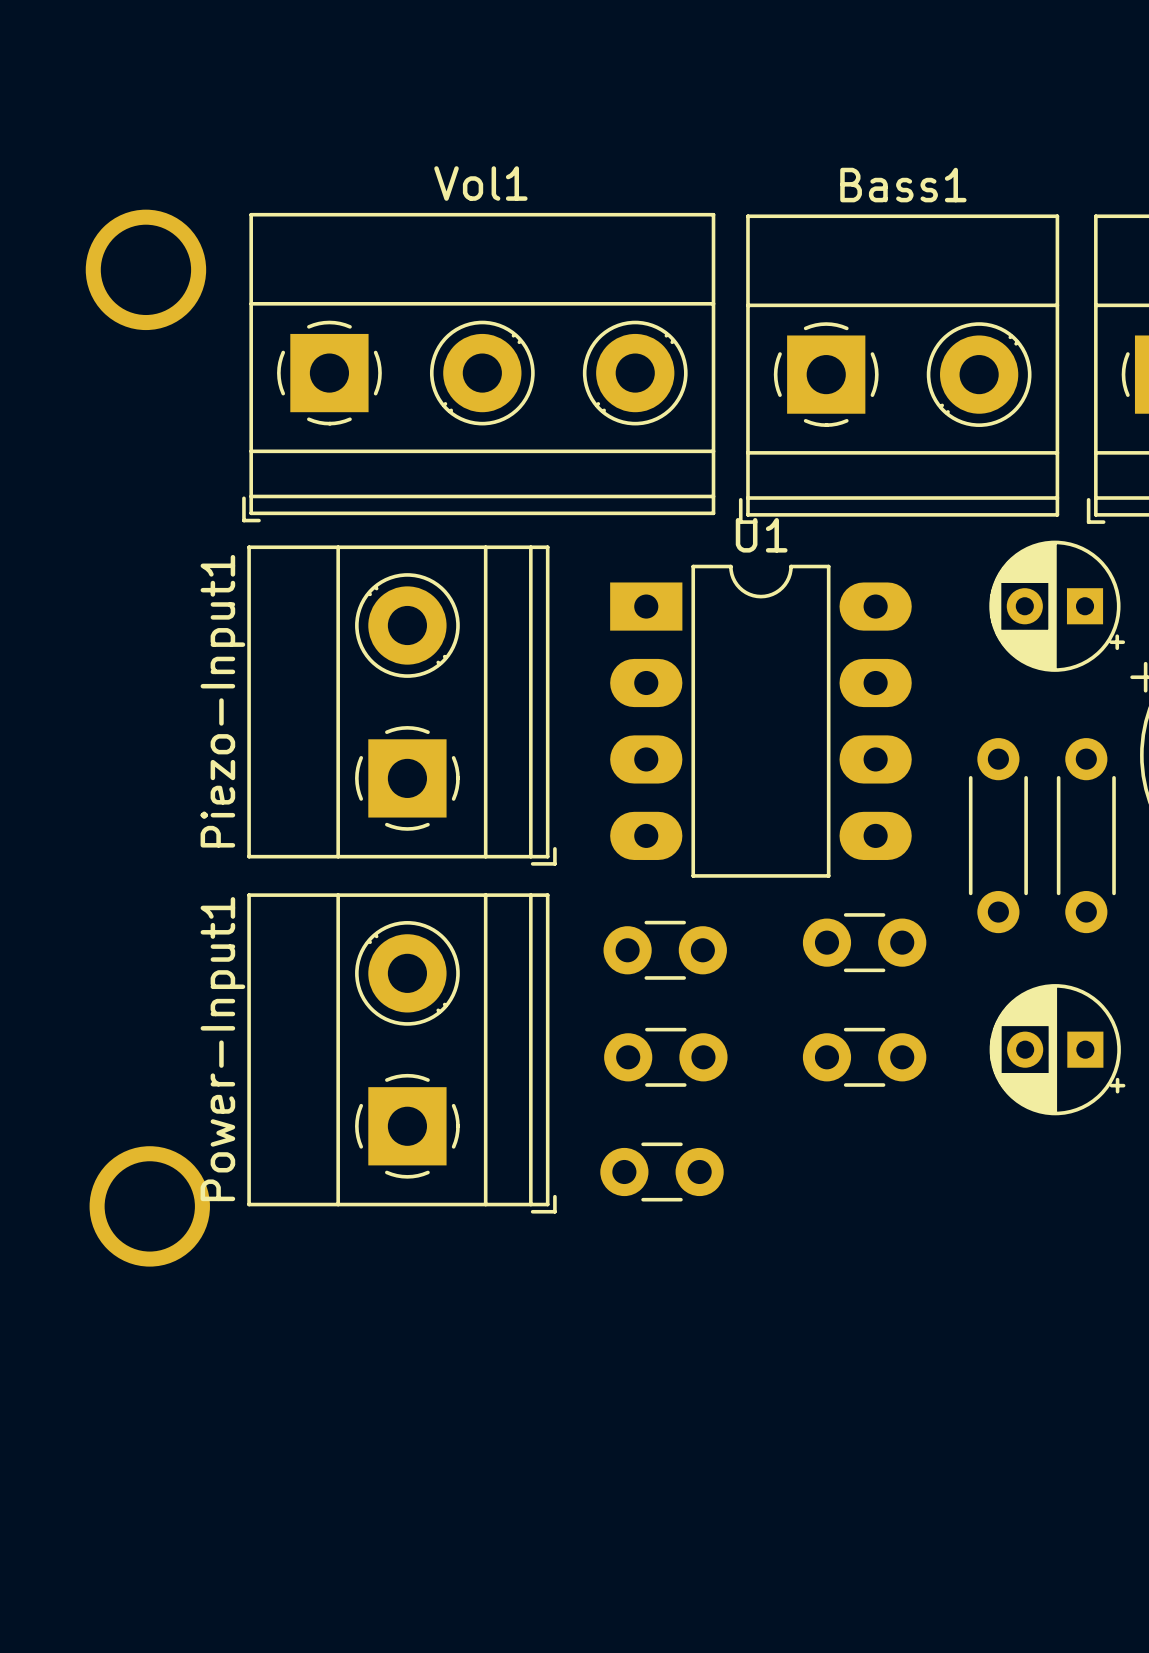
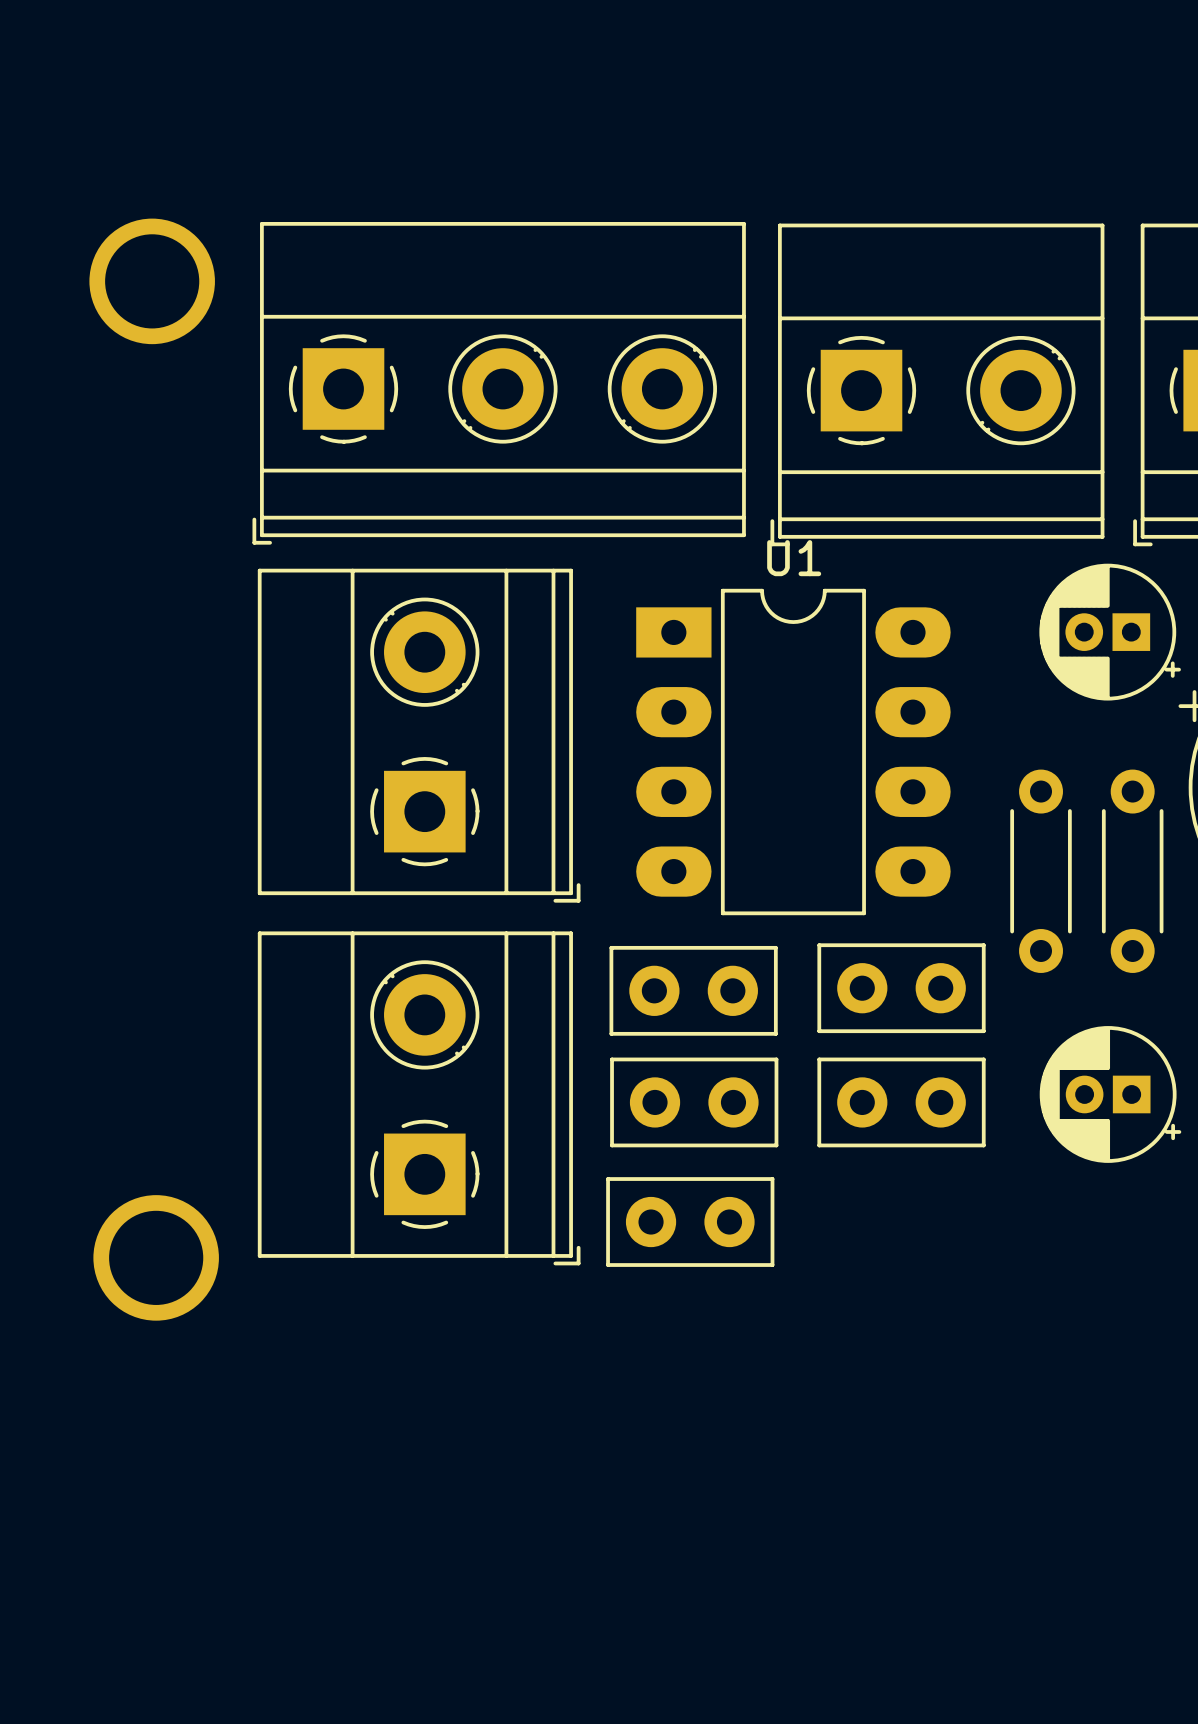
Vol1 name: Vol1 (480, 183) -> none
Bass1 name: Bass1 (903, 185) -> none
part footprint: [989, 540, 1126, 672] -> [1039, 563, 1181, 701]
Piezo-Input1 name: Piezo-Input1 (222, 701) -> none
part footprint: [802, 913, 927, 973] -> [817, 943, 986, 1034]
part footprint: [603, 920, 727, 980] -> [609, 945, 778, 1036]
part footprint: [989, 984, 1126, 1116] -> [1039, 1026, 1182, 1163]
part footprint: [604, 1027, 728, 1087] -> [610, 1057, 779, 1148]
part footprint: [802, 1027, 927, 1087] -> [817, 1057, 986, 1148]
Power-Input1 name: Power-Input1 (222, 1049) -> none
part footprint: [600, 1142, 724, 1202] -> [606, 1177, 775, 1267]

